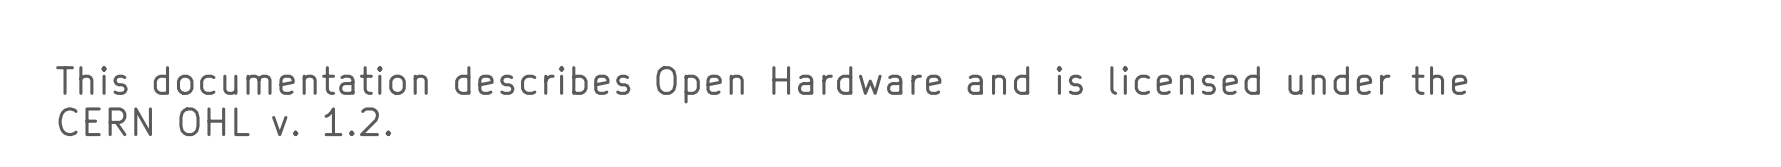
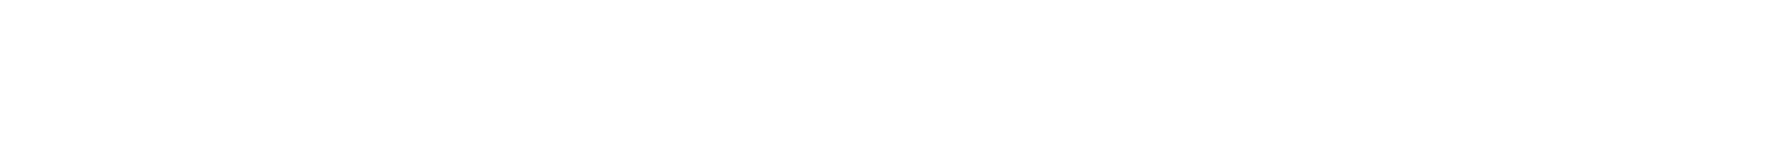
text: This documentation describes Open Hardware and is licensed under the (761, 84) -> none
text: CERN OHL v. 1.2. (224, 121) -> none

